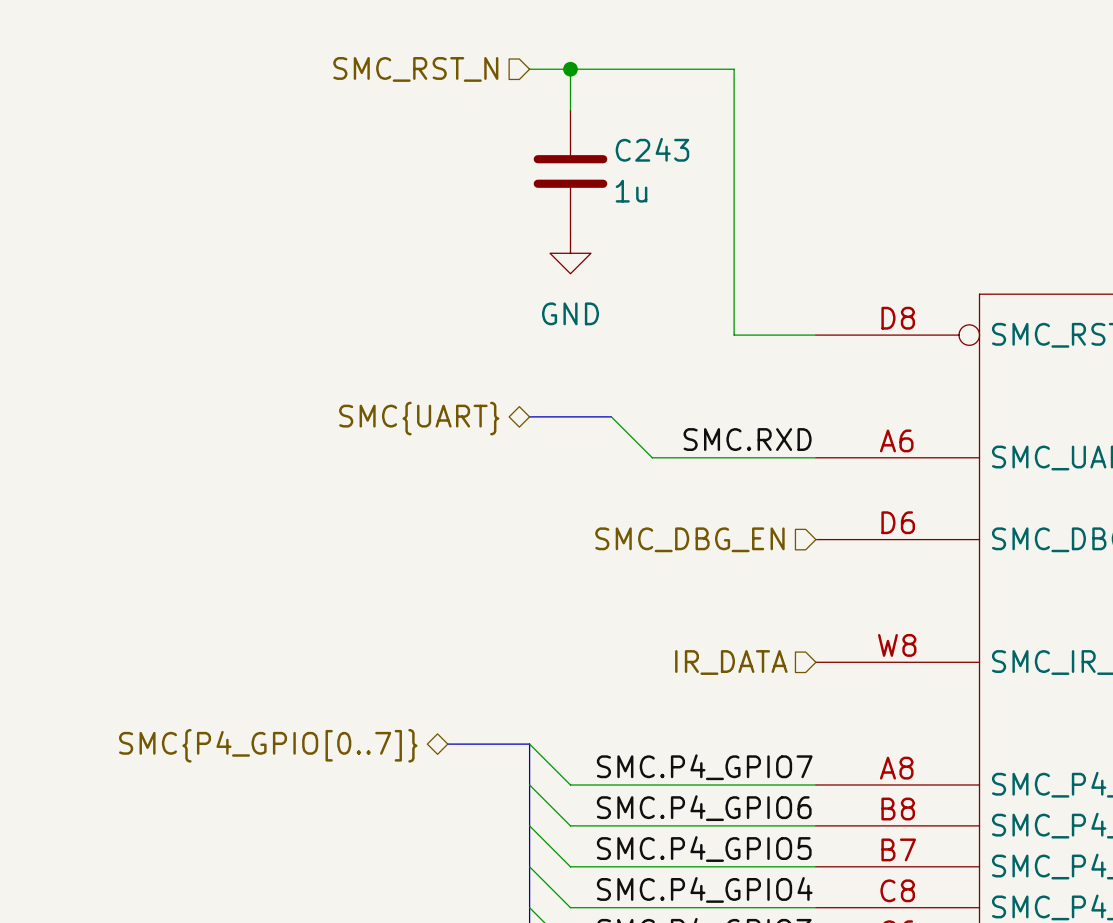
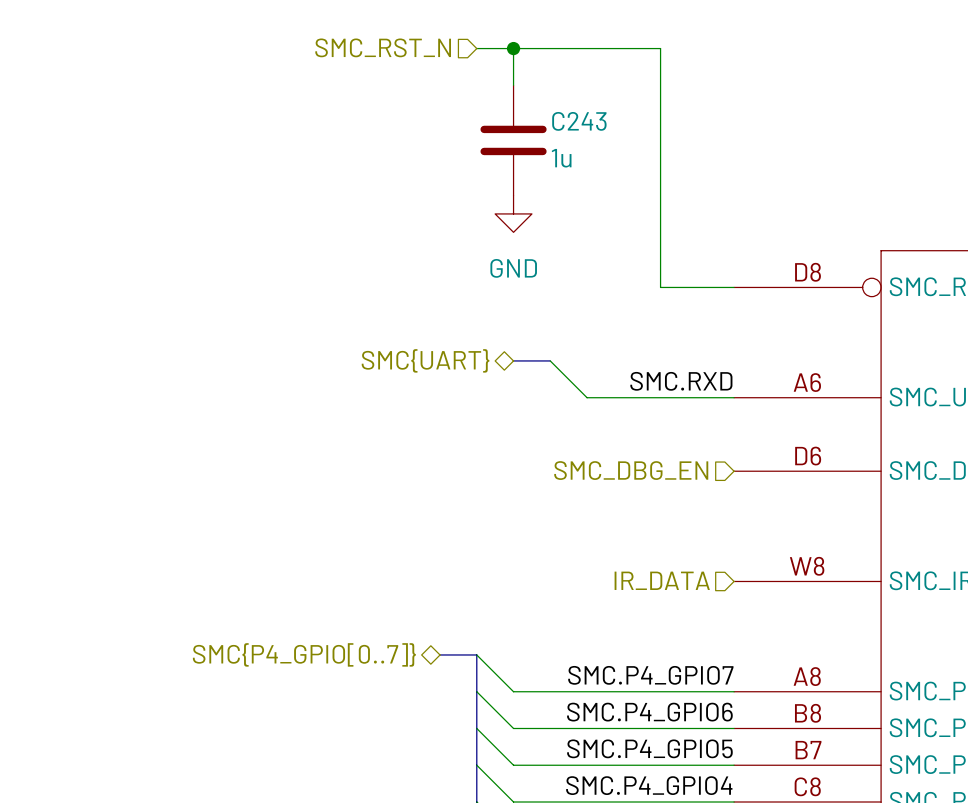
bus: (529, 416) (570, 416) -> none
hierarchical label position: SMC{UART} (419, 418) -> SMC{UART} (425, 360)
bus: (447, 744) (488, 744) -> none
hierarchical label position: SMC{P4_GPIO[0..7]} (268, 745) -> SMC{P4_GPIO[0..7]} (304, 654)

